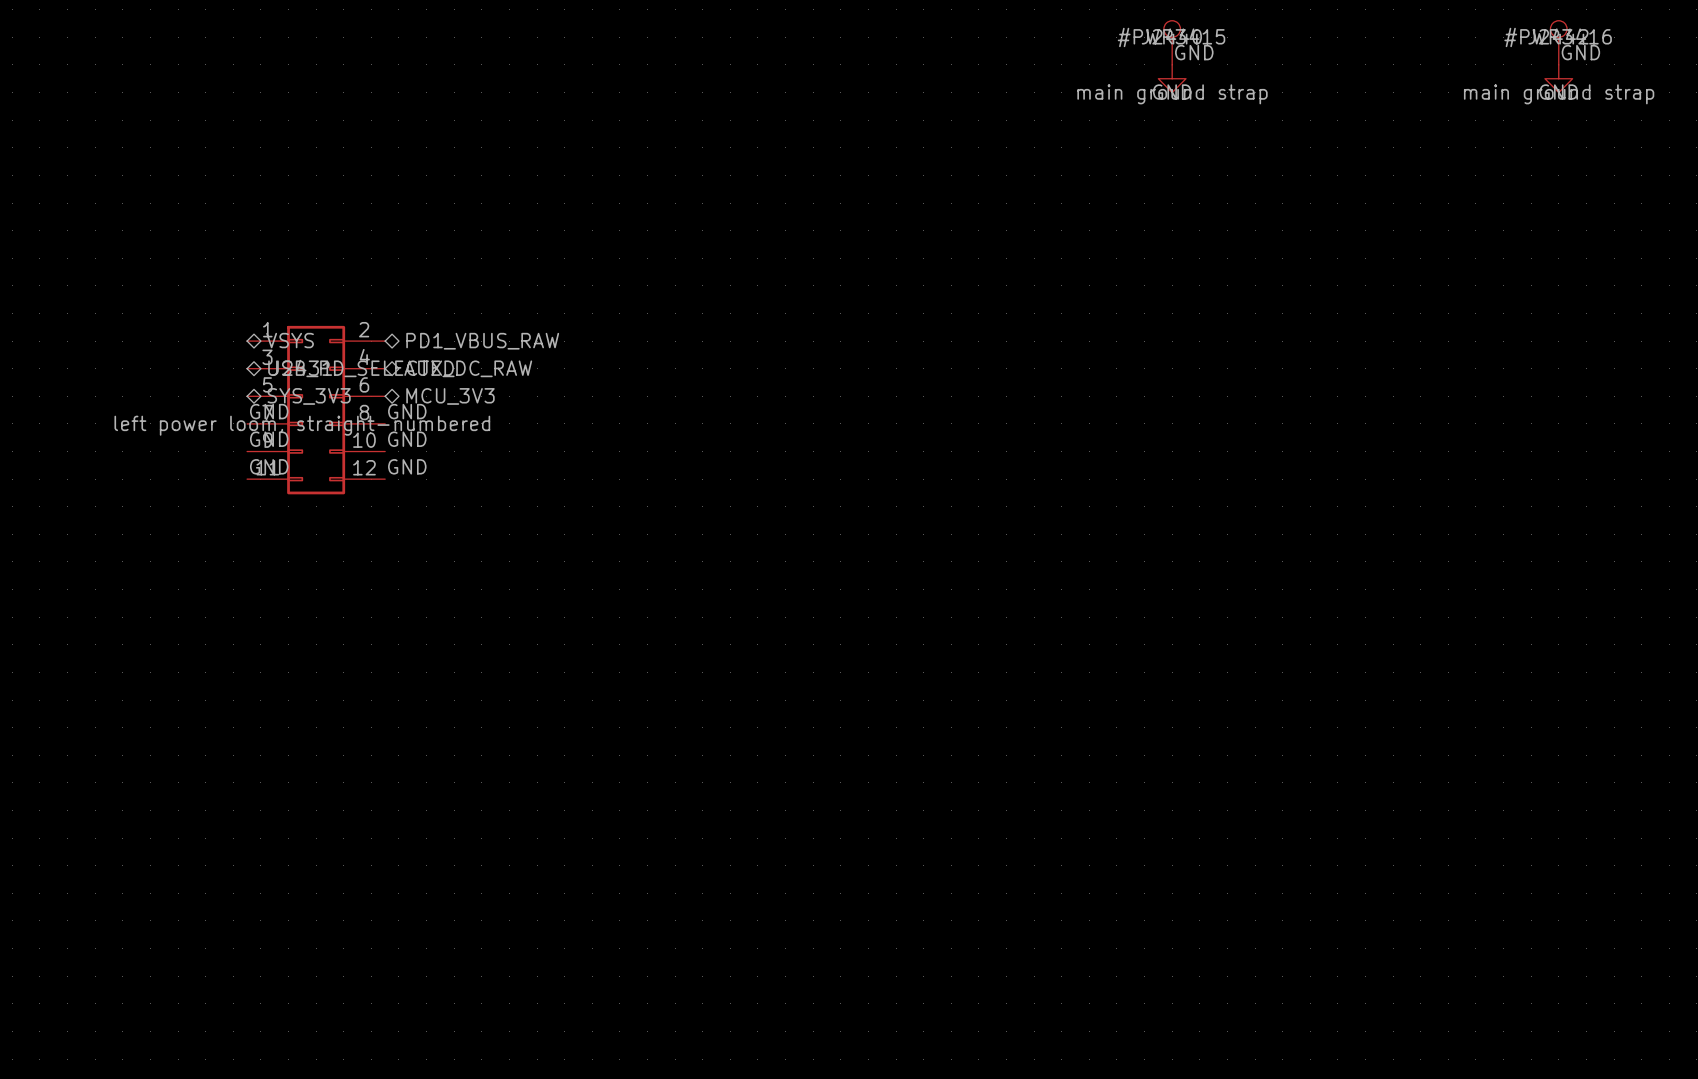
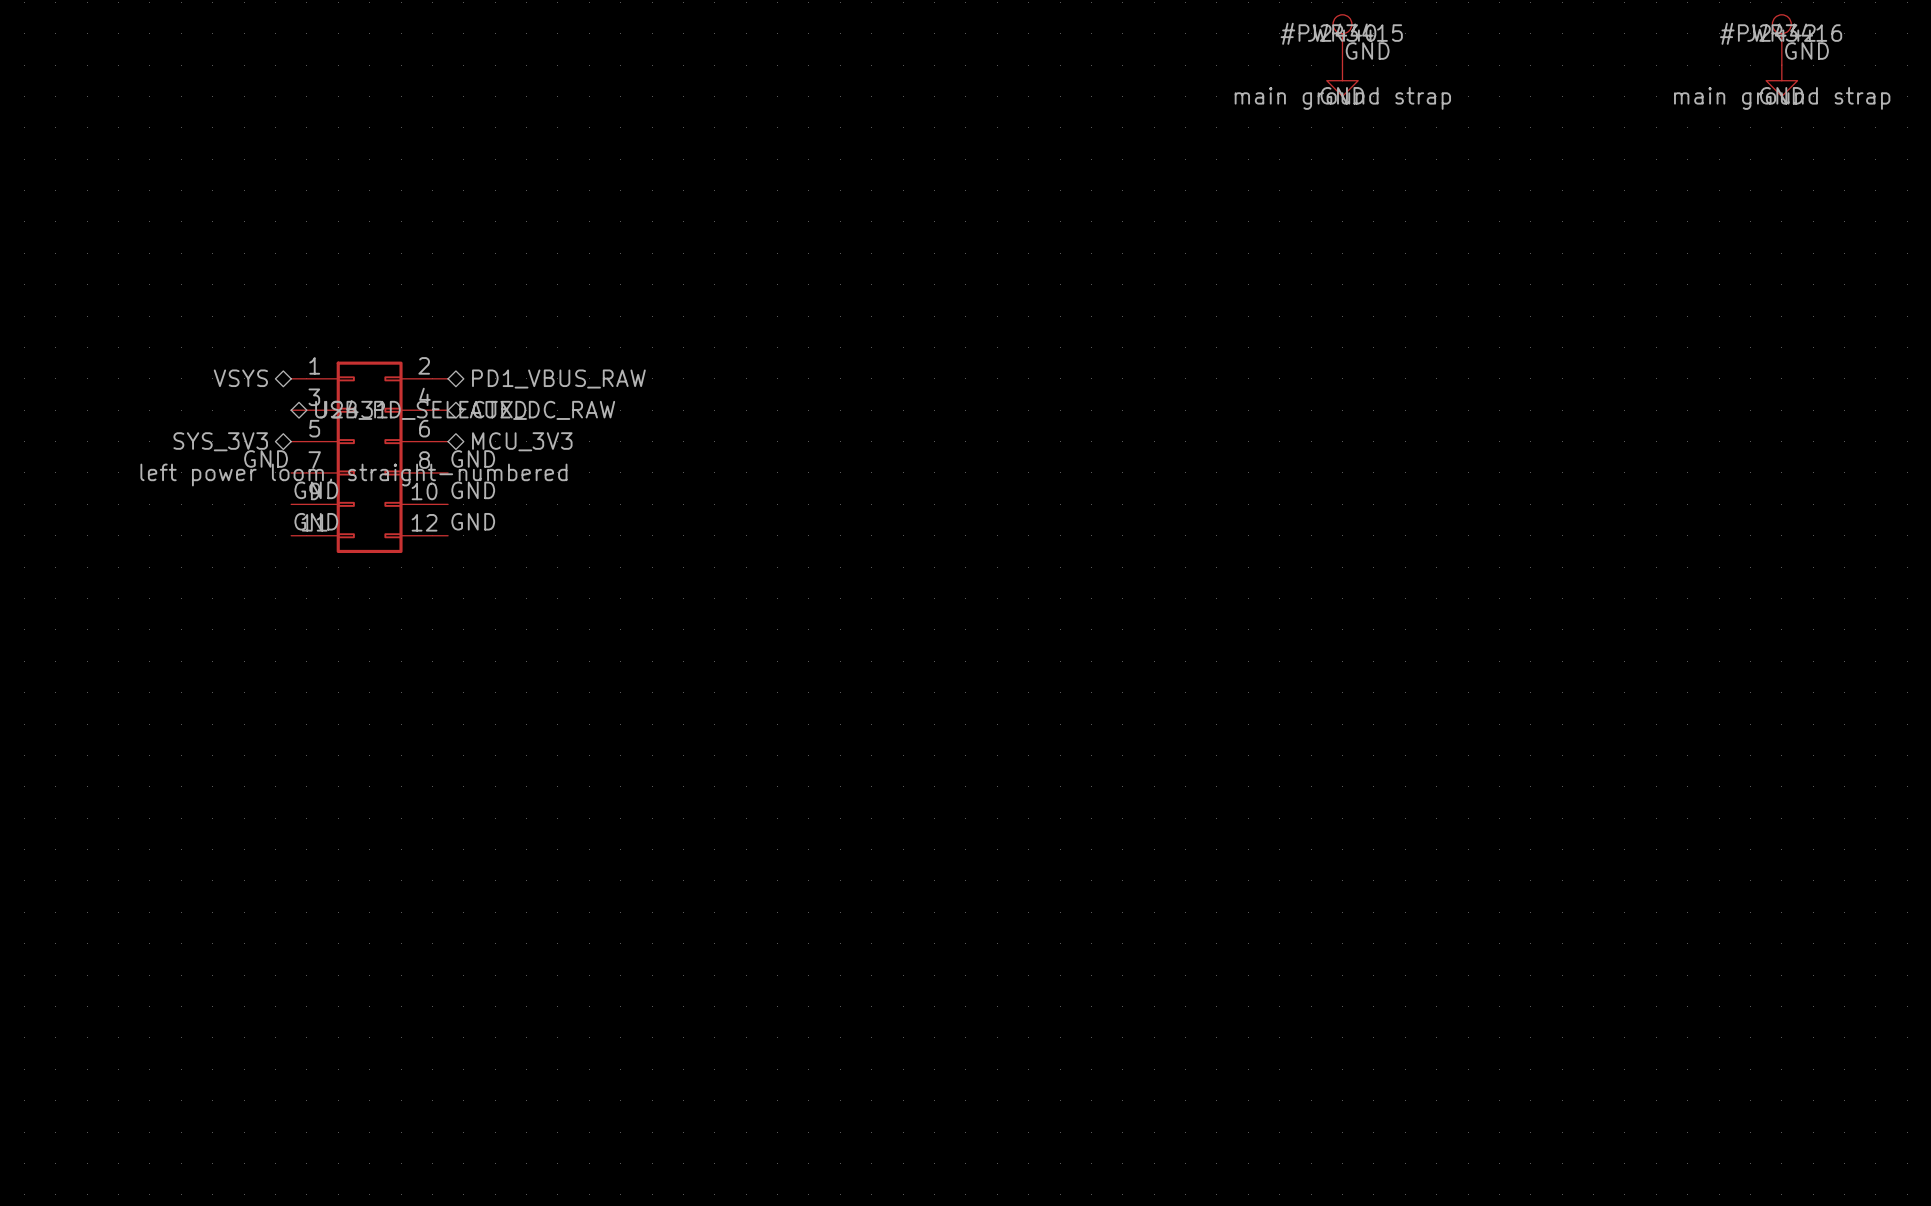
hierarchical label rotation: 0° (290, 340) -> 180° (240, 378)
hierarchical label position: VSYS (290, 340) -> VSYS (240, 378)
hierarchical label rotation: 0° (309, 396) -> 180° (220, 441)
hierarchical label position: SYS_3V3 (309, 396) -> SYS_3V3 (220, 441)
label position: GND (269, 411) -> GND (266, 458)

